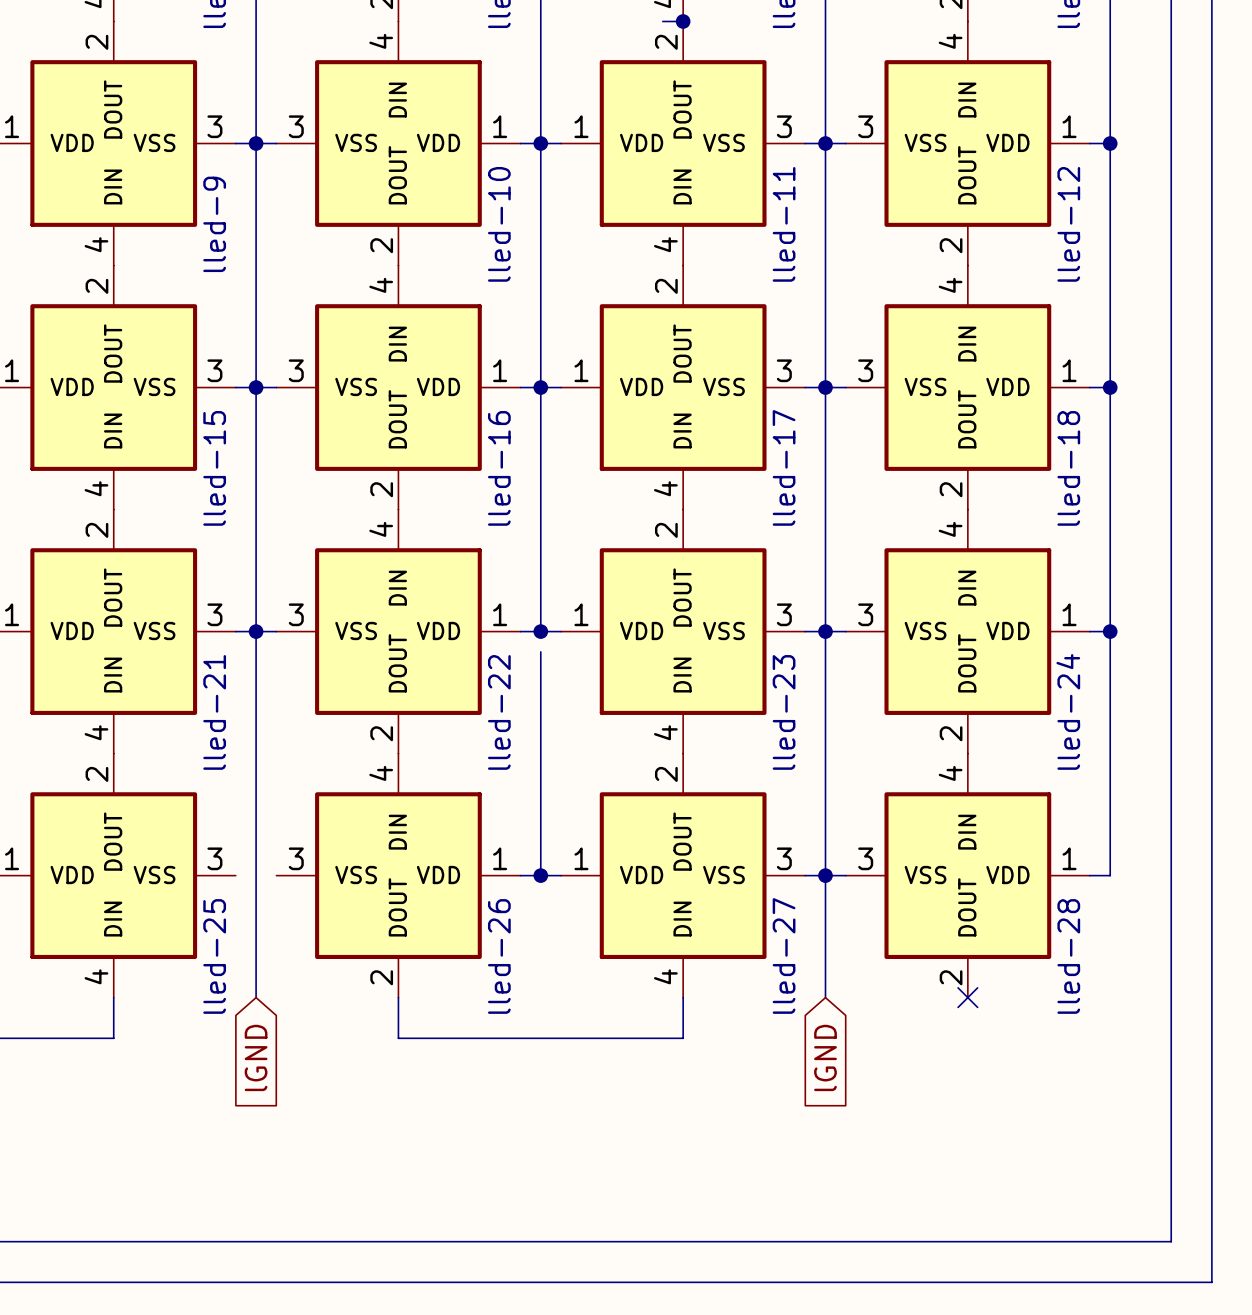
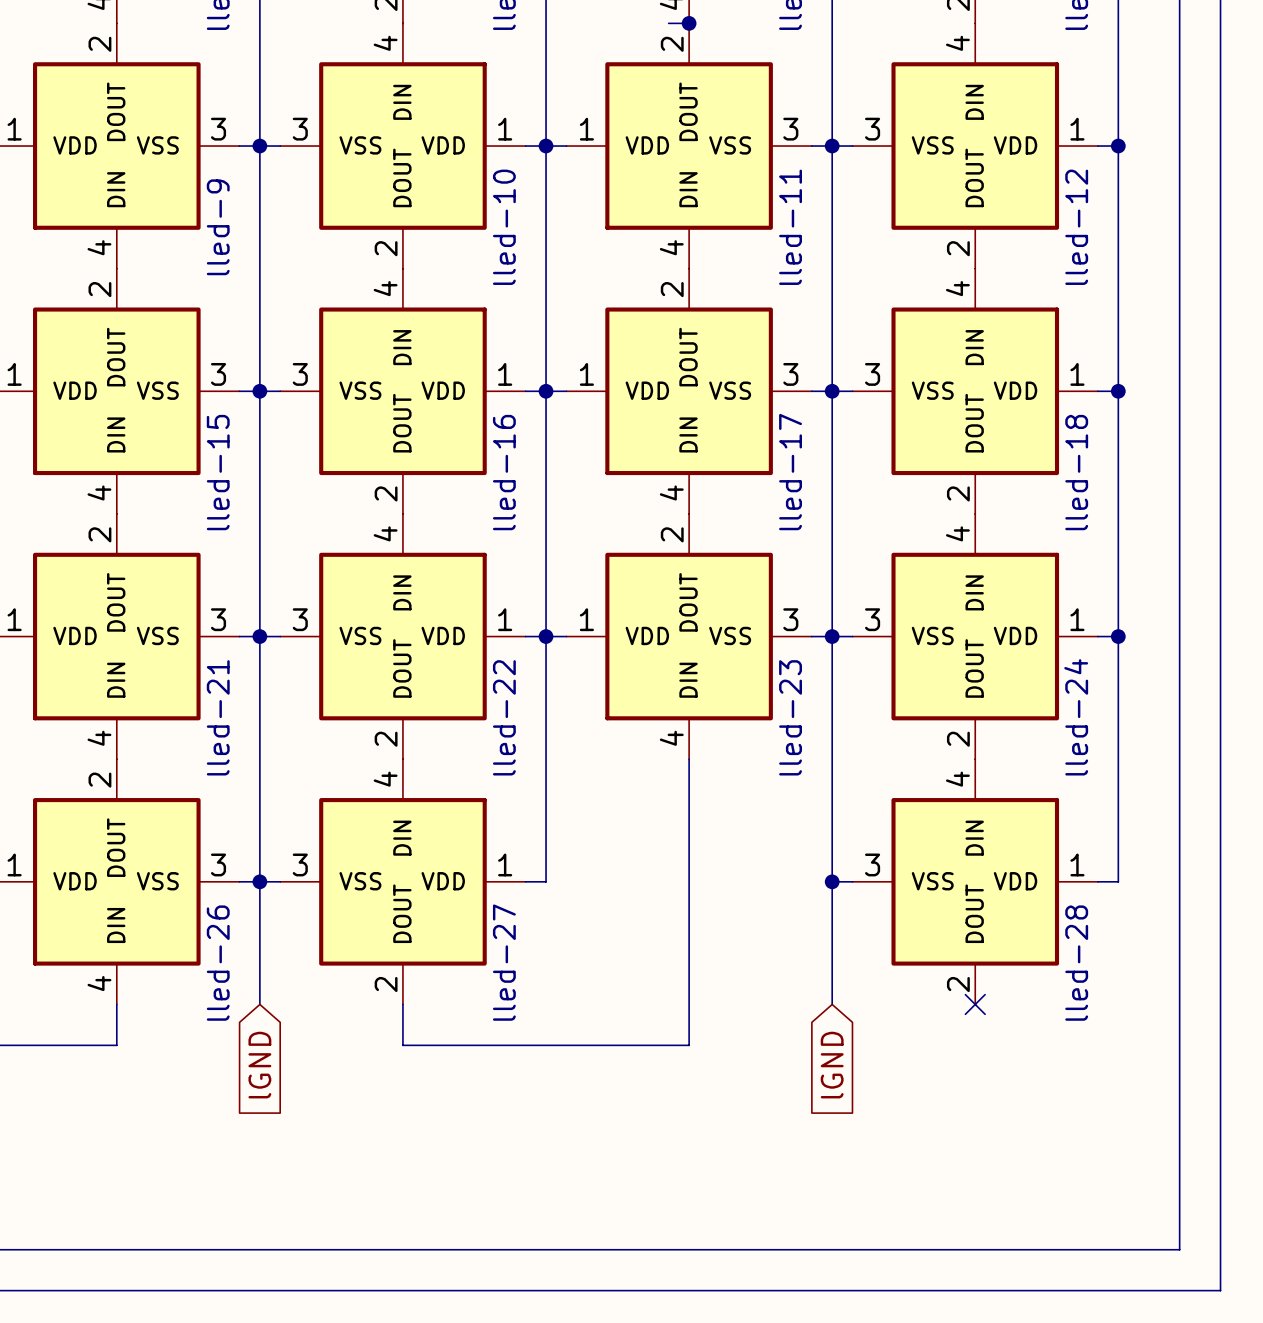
wire: none -> (546, 636) (546, 657)
wire: none -> (239, 881) (280, 881)
junction: none -> (259, 881)
wire: (540, 875) (561, 875) -> none
junction: (540, 875) -> none
lled-27: (683, 875) -> none
wire: (805, 875) (825, 875) -> none
lled-25 name: lled-25 (214, 956) -> lled-26 (218, 963)
lled-26 name: lled-26 (499, 956) -> lled-27 (504, 962)

